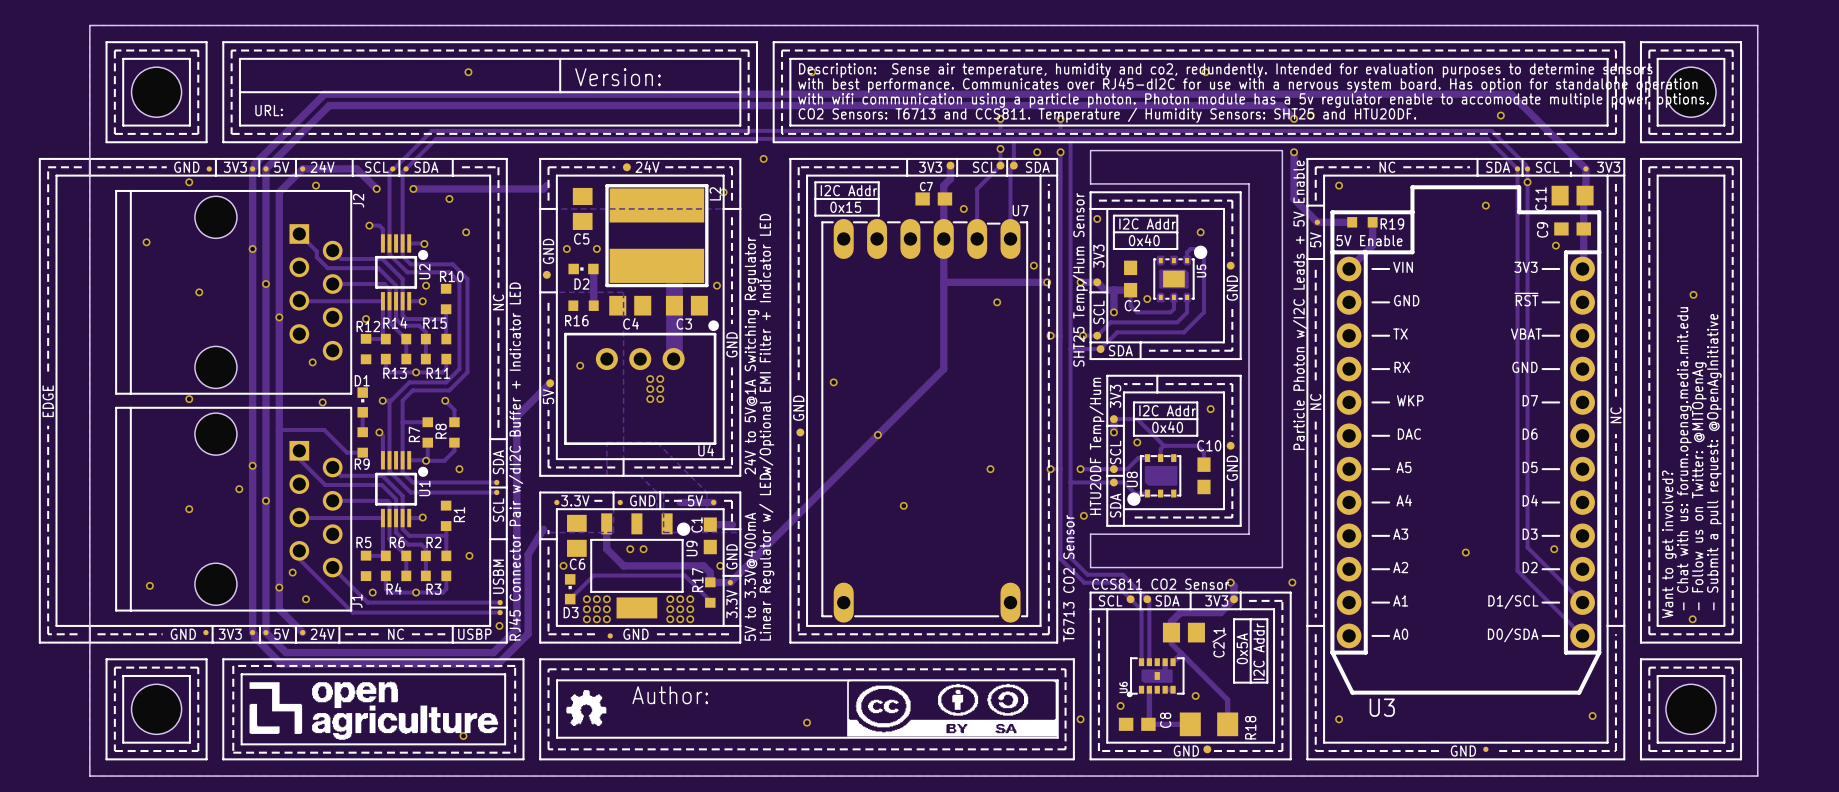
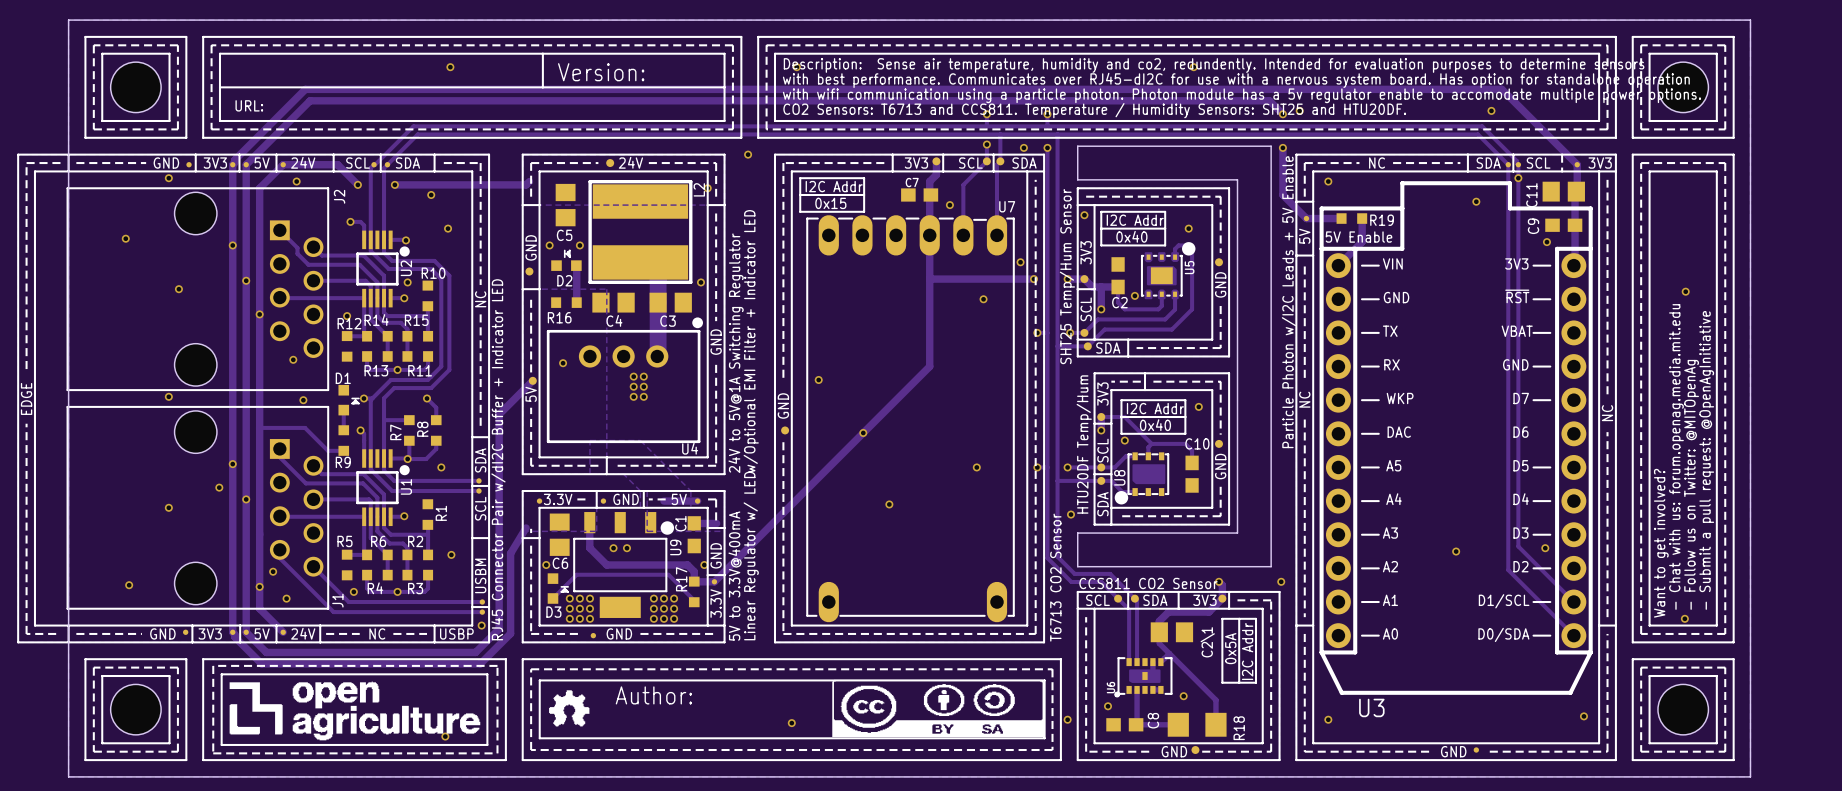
J2 footprint: [115, 189, 353, 395] -> [66, 187, 330, 392]
D2 footprint: [568, 263, 599, 275] -> [551, 249, 582, 271]
D1 footprint: [357, 387, 368, 418] -> [338, 384, 360, 416]
J1 footprint: [115, 406, 353, 612] -> [66, 405, 330, 610]
D3 footprint: [564, 574, 576, 605] -> [547, 573, 569, 604]

